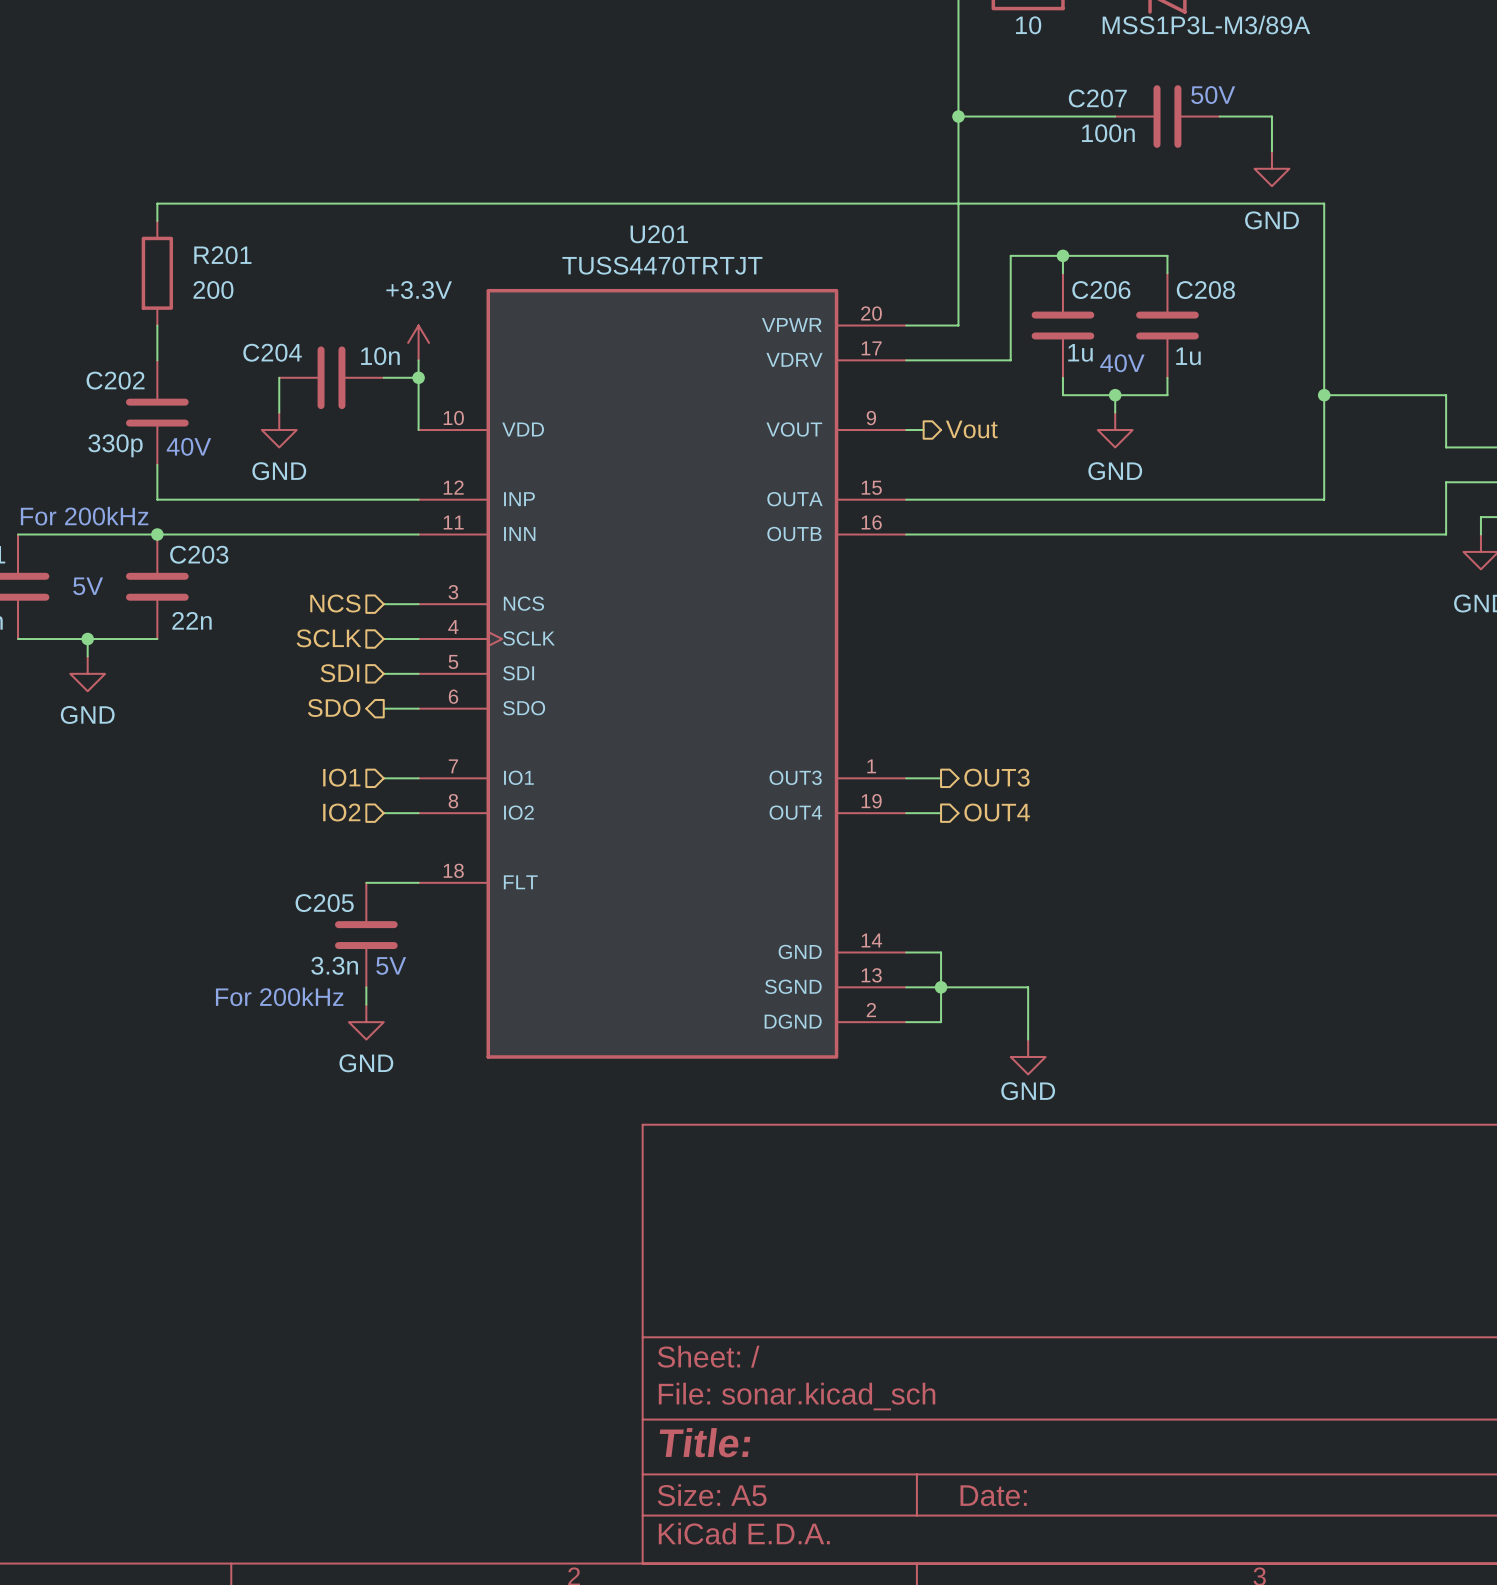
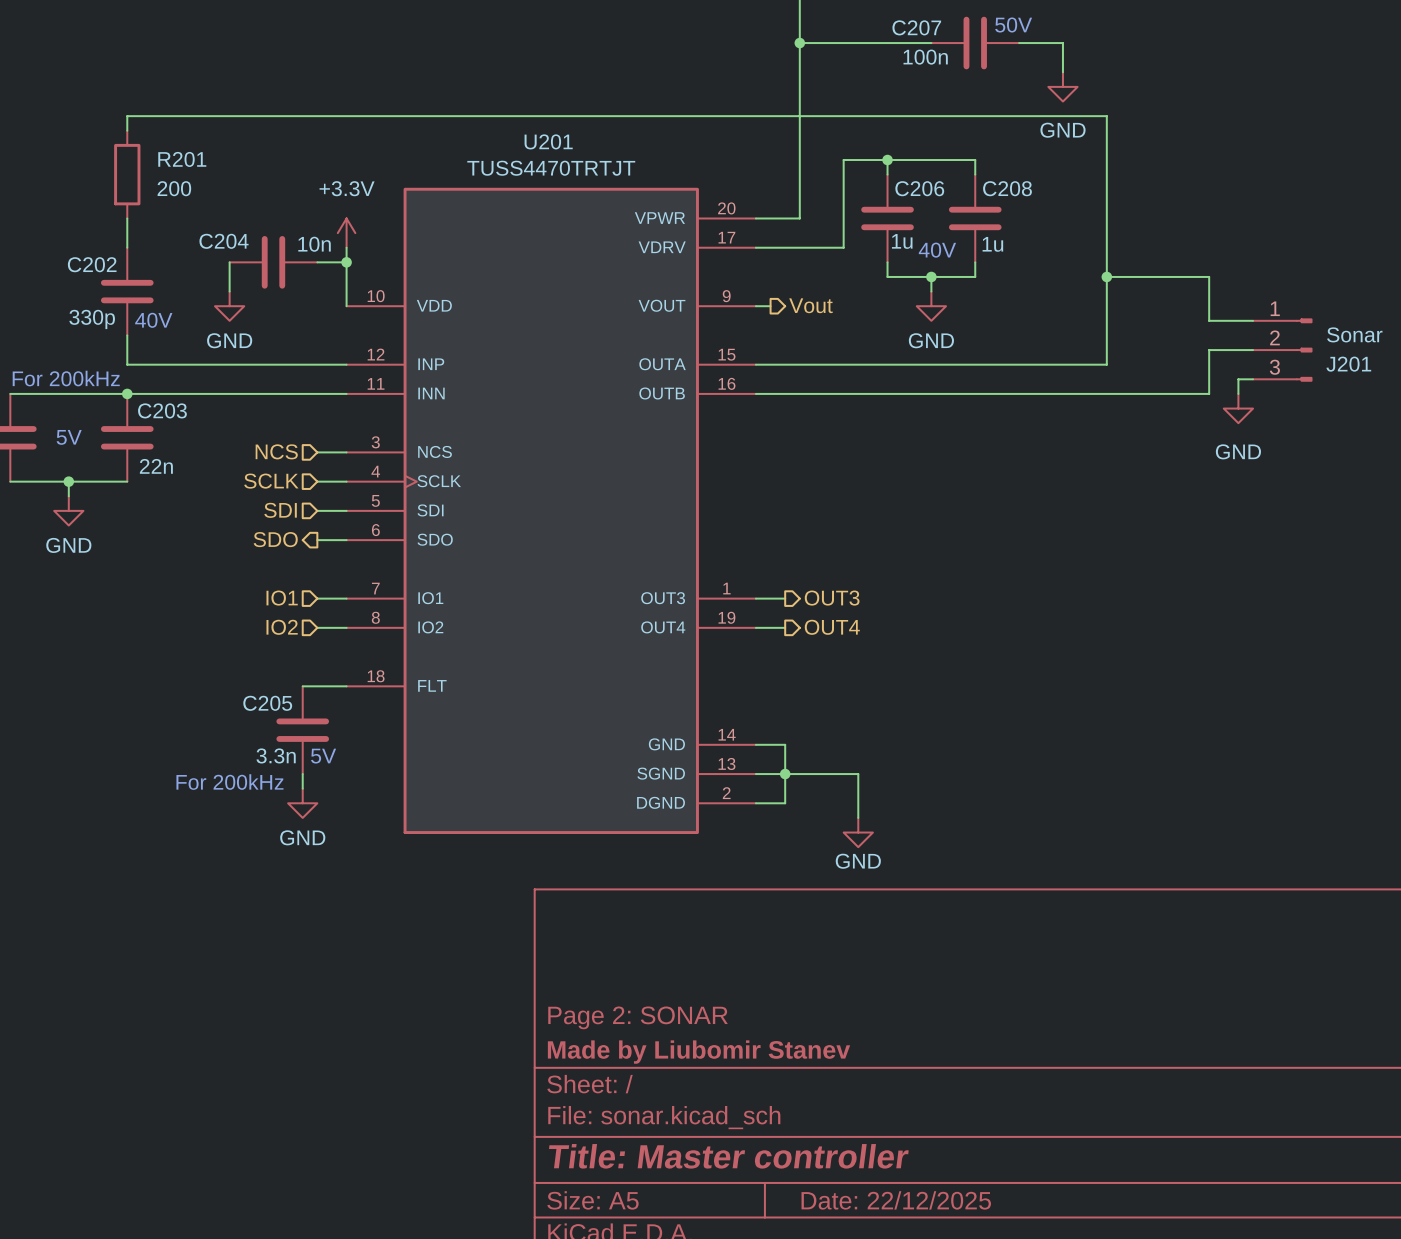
title block: none -> Page 2: SONAR (638, 1017)
title block: none -> Made by Liubomir Stanev (699, 1052)
title block: Title: (704, 1442) -> Title: Master controller (728, 1156)
title block: Date: (993, 1495) -> Date: 22/12/2025 (896, 1200)

